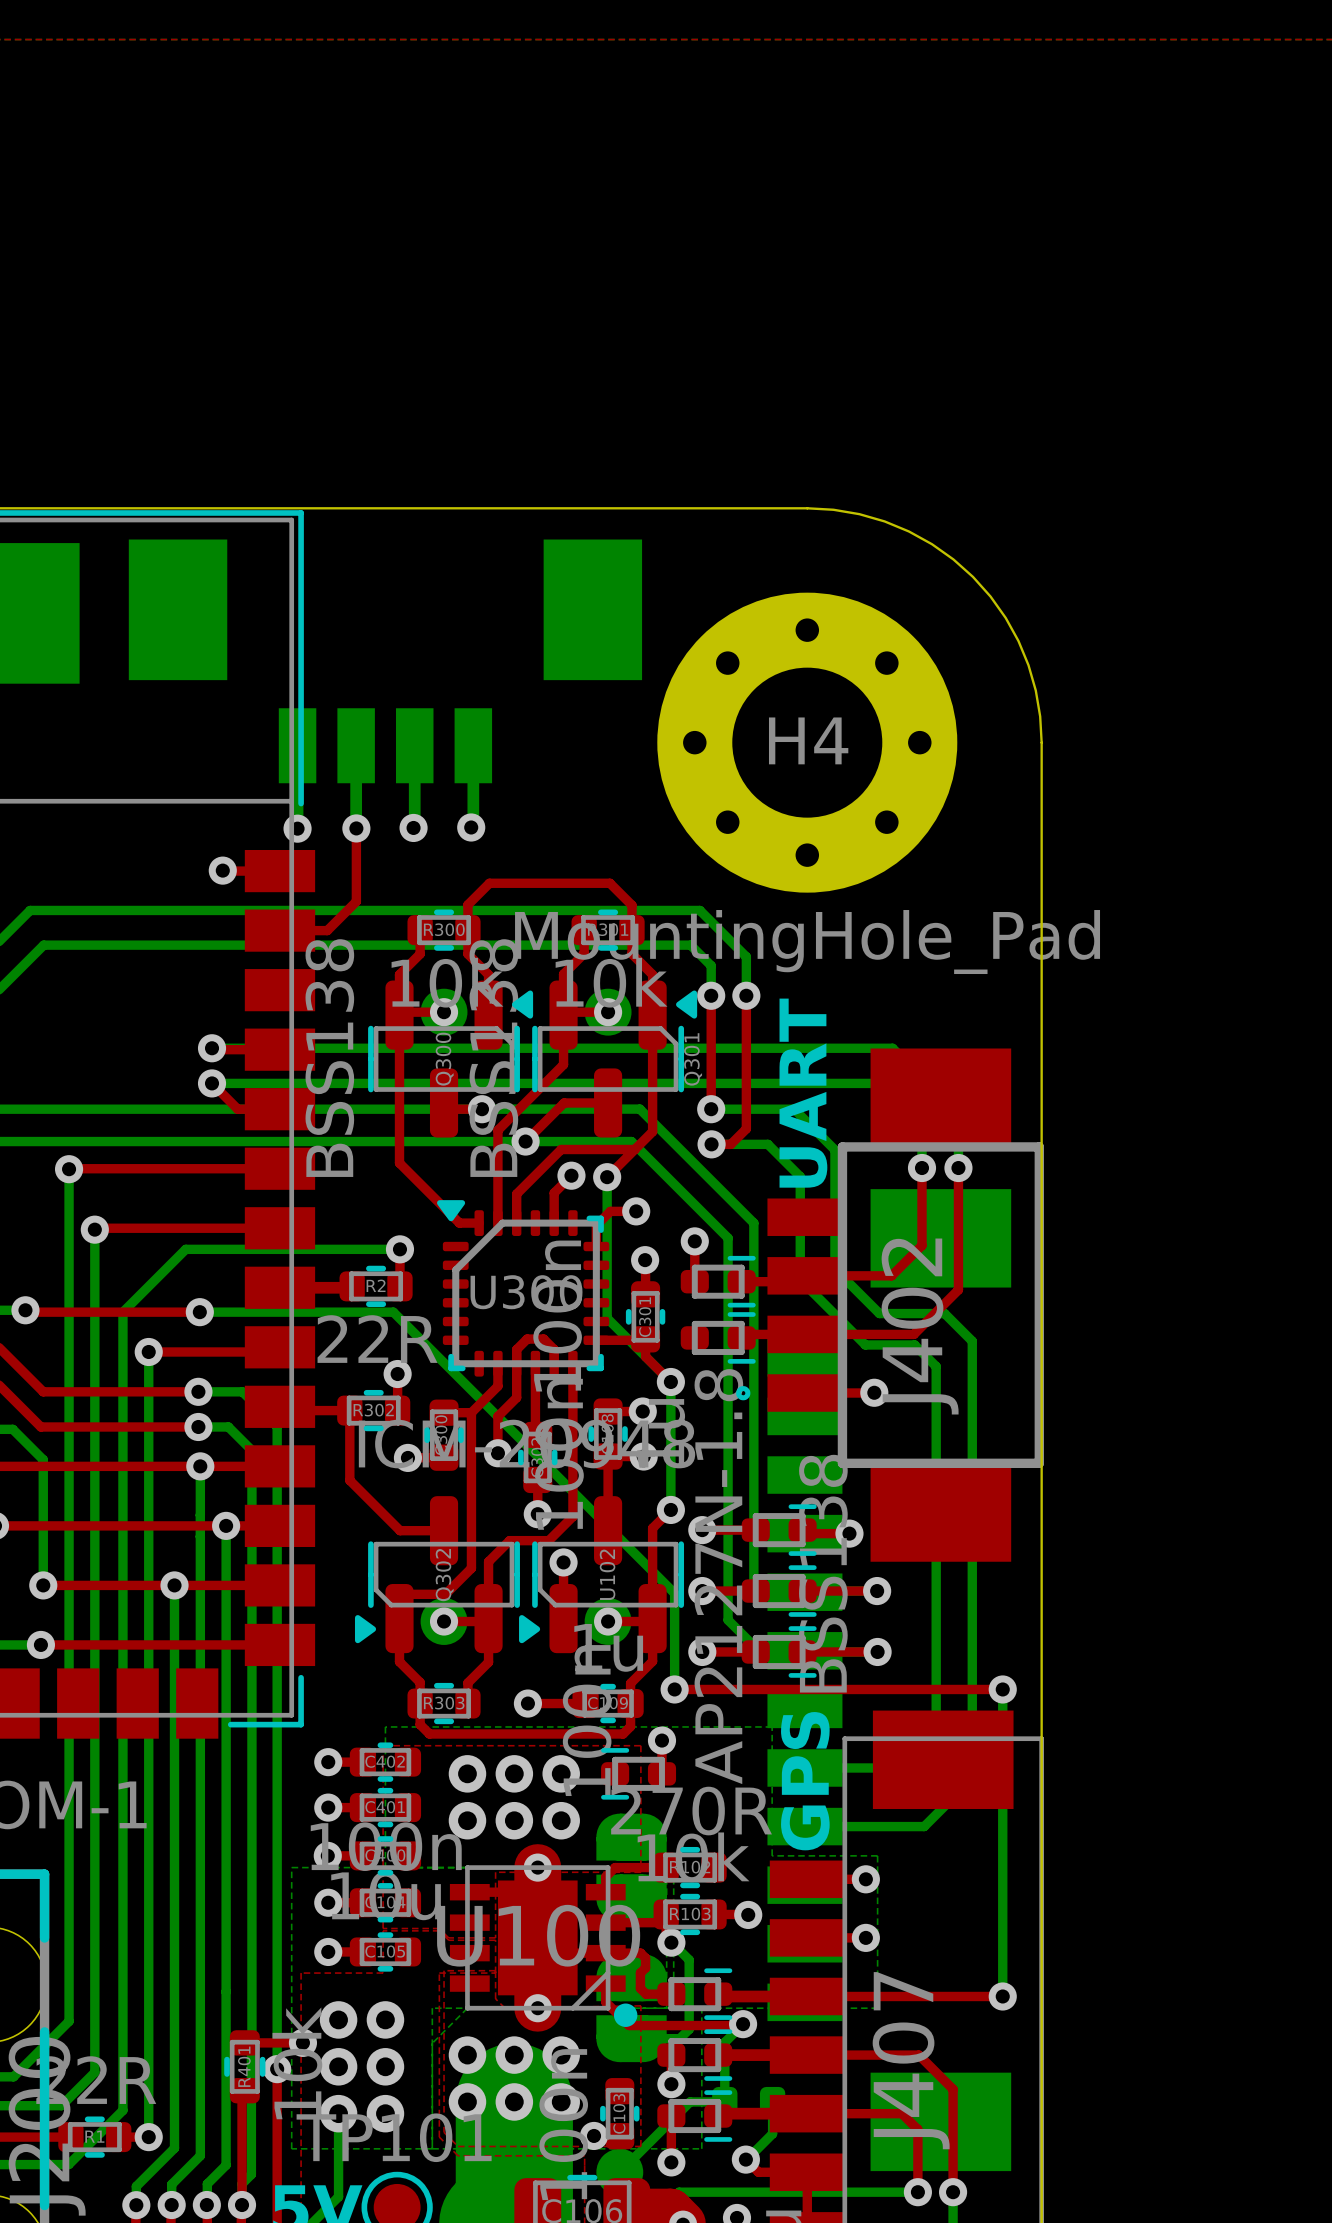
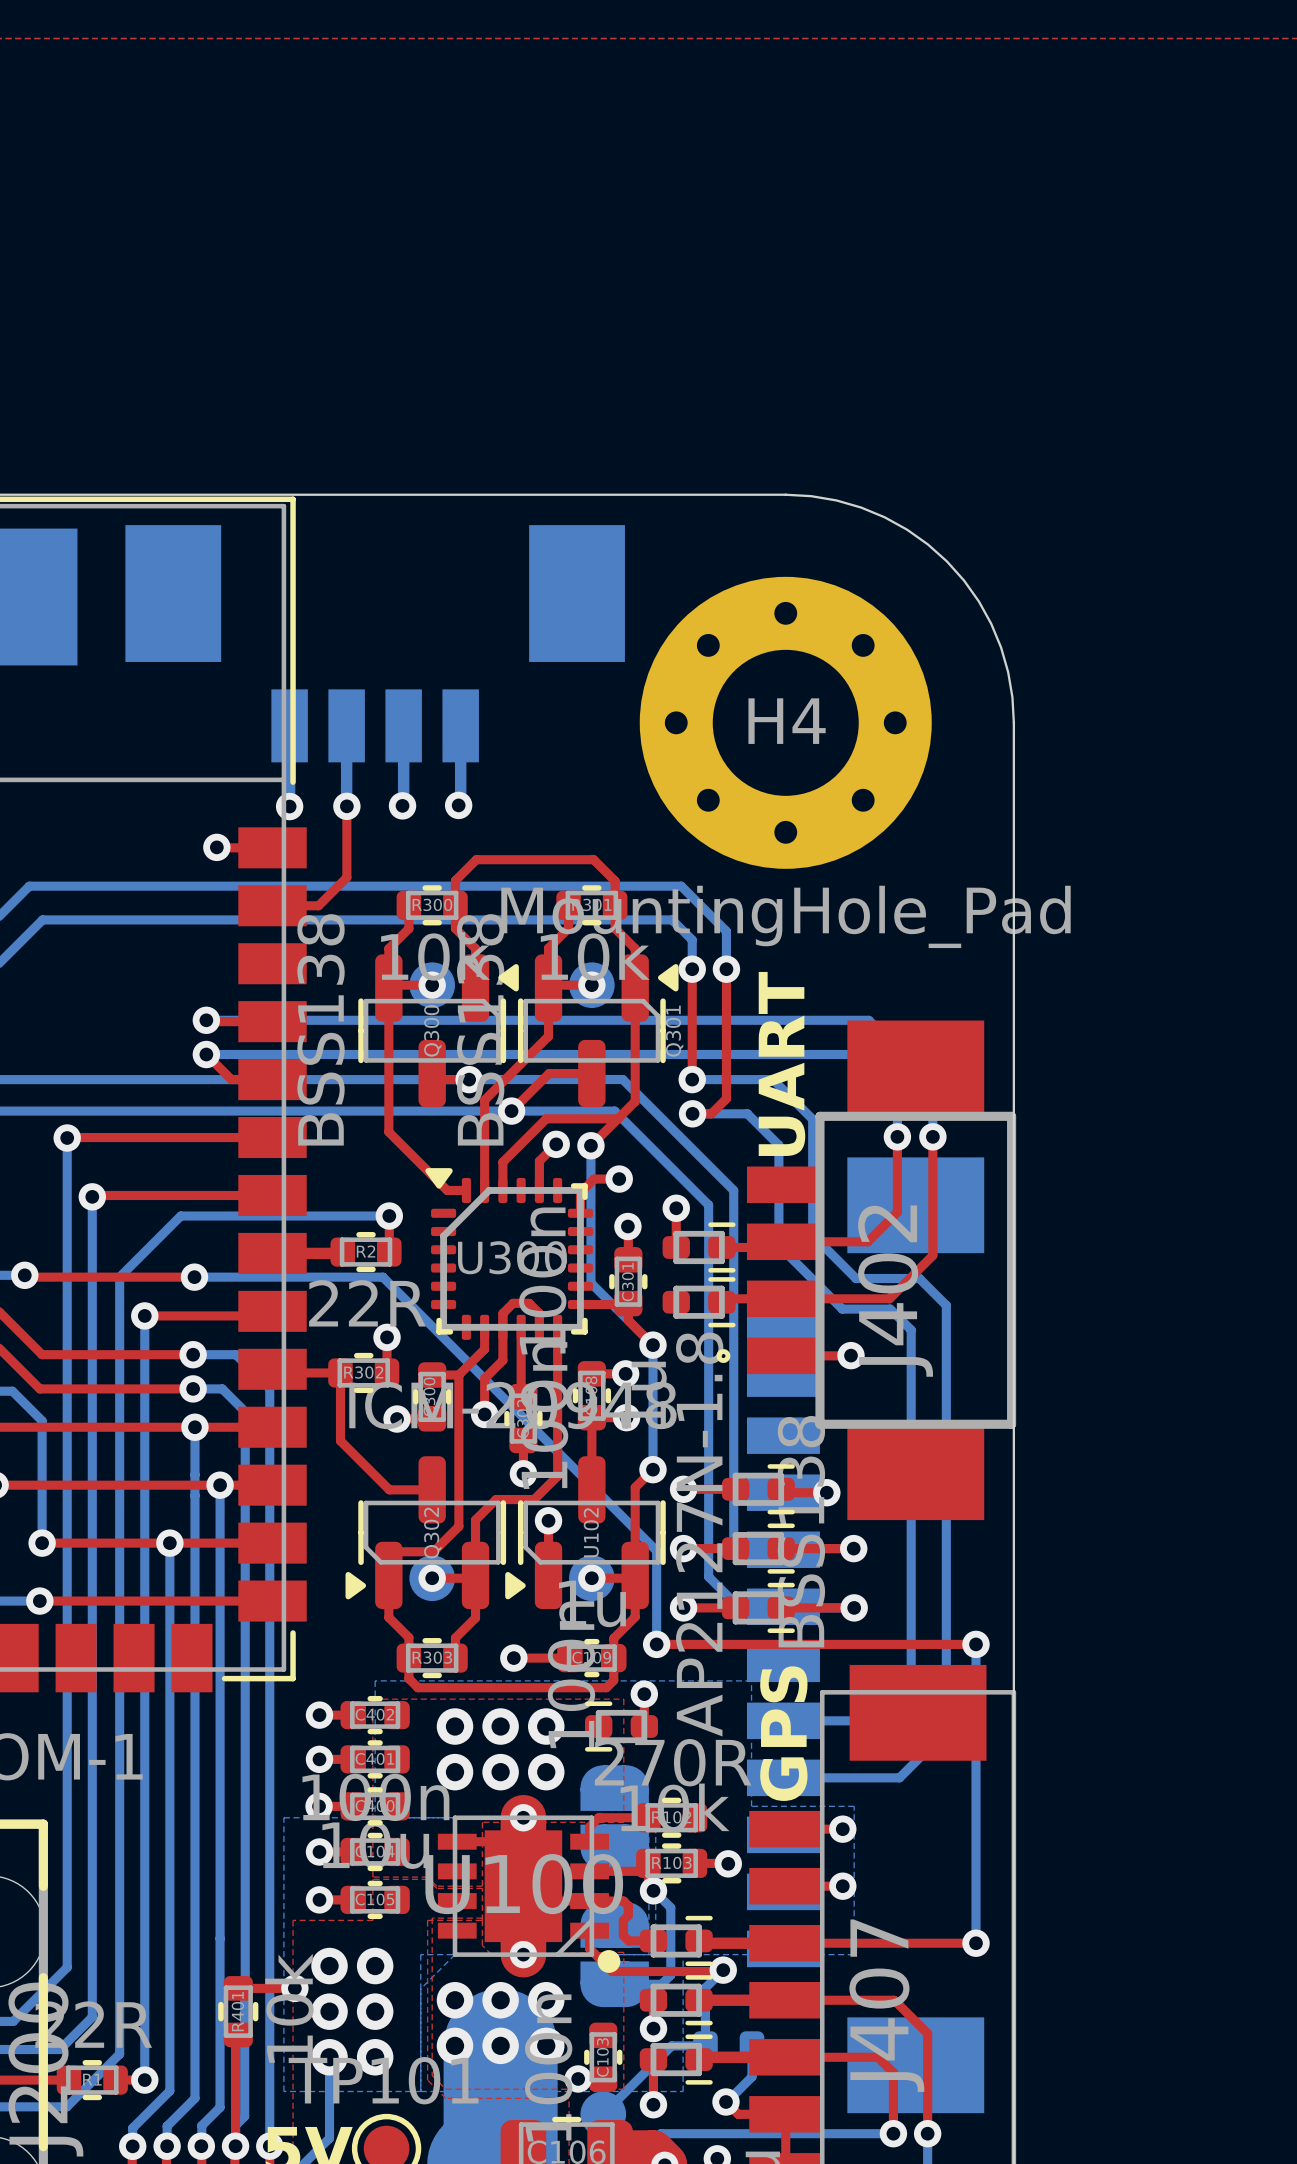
top track: (277, 2069) (277, 2205) -> none
bottom track: none -> (269, 2013) (269, 2146)
via position: (277, 2069) -> (269, 2146)

